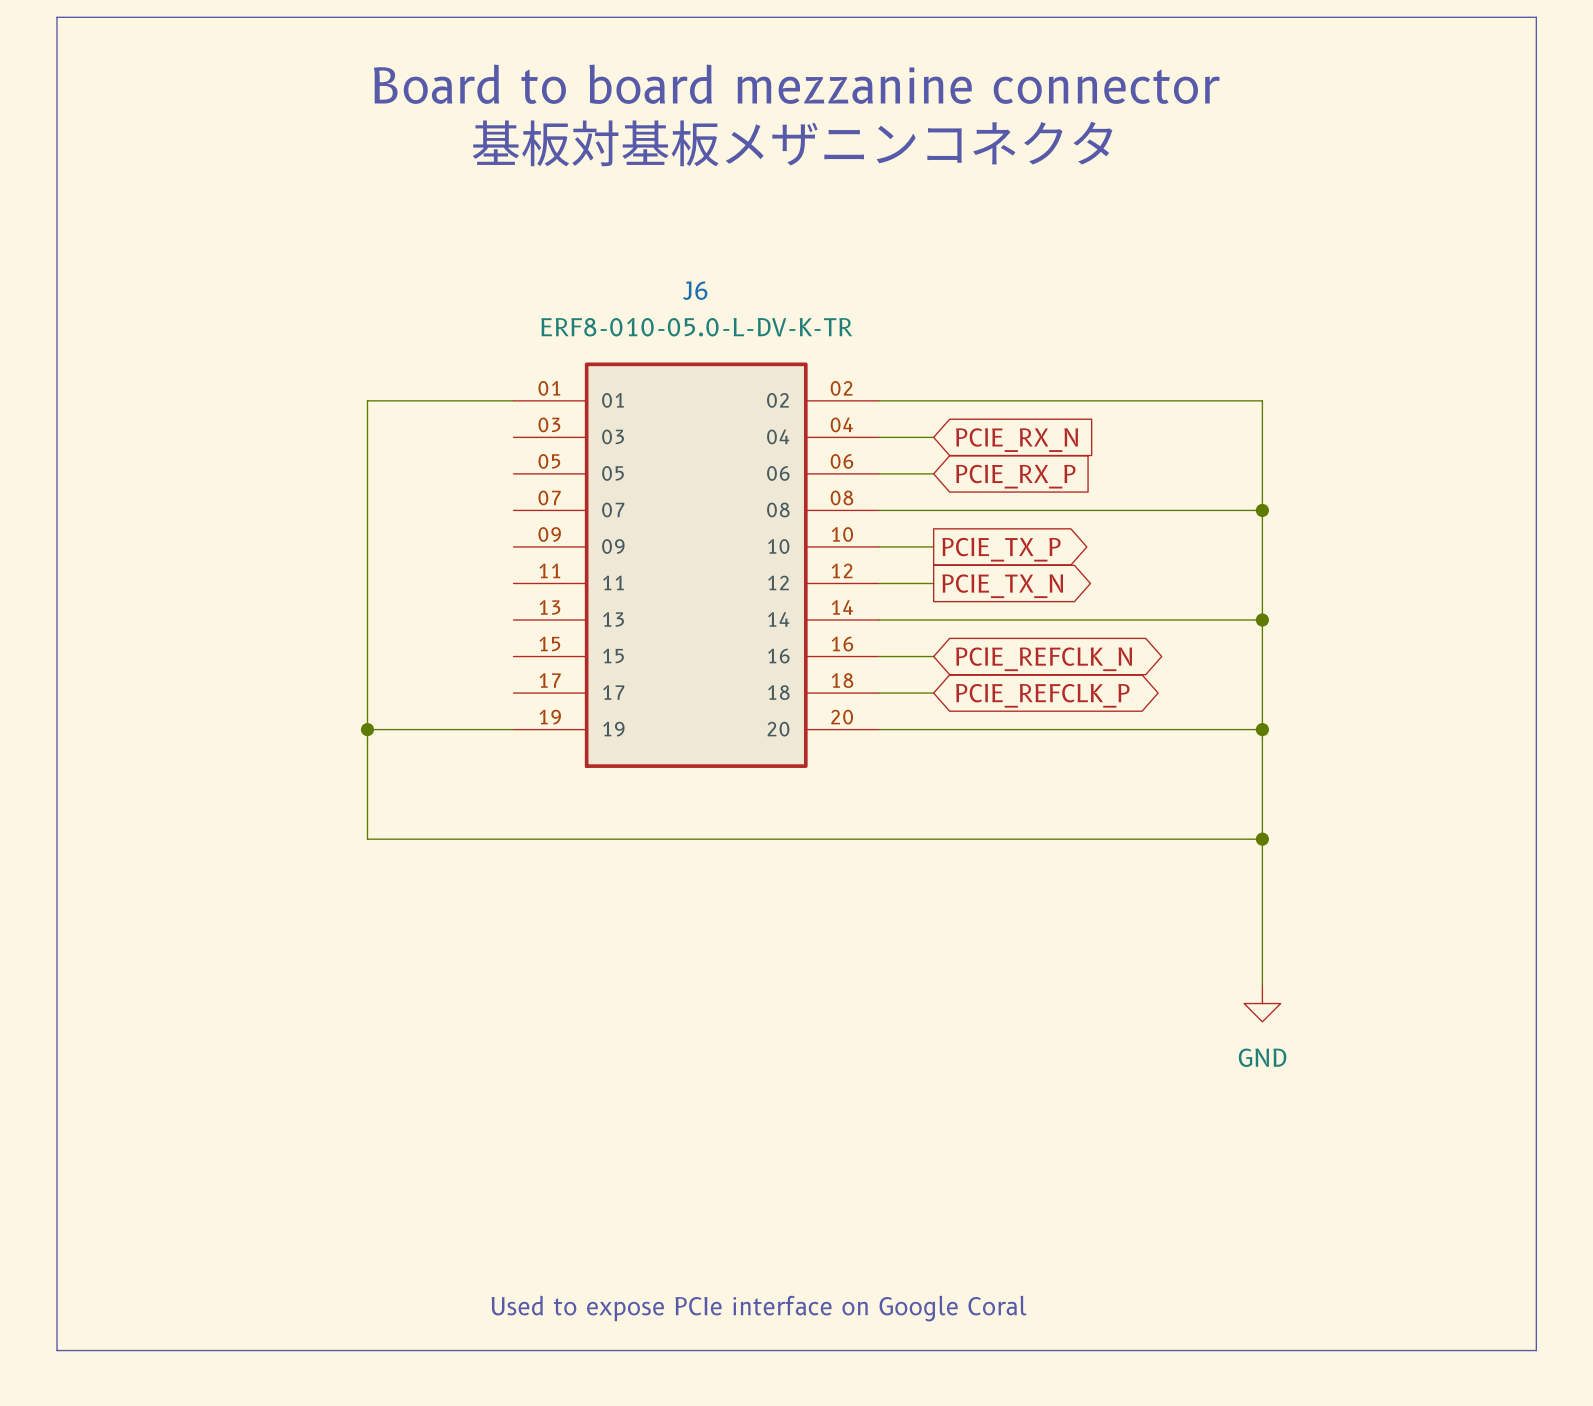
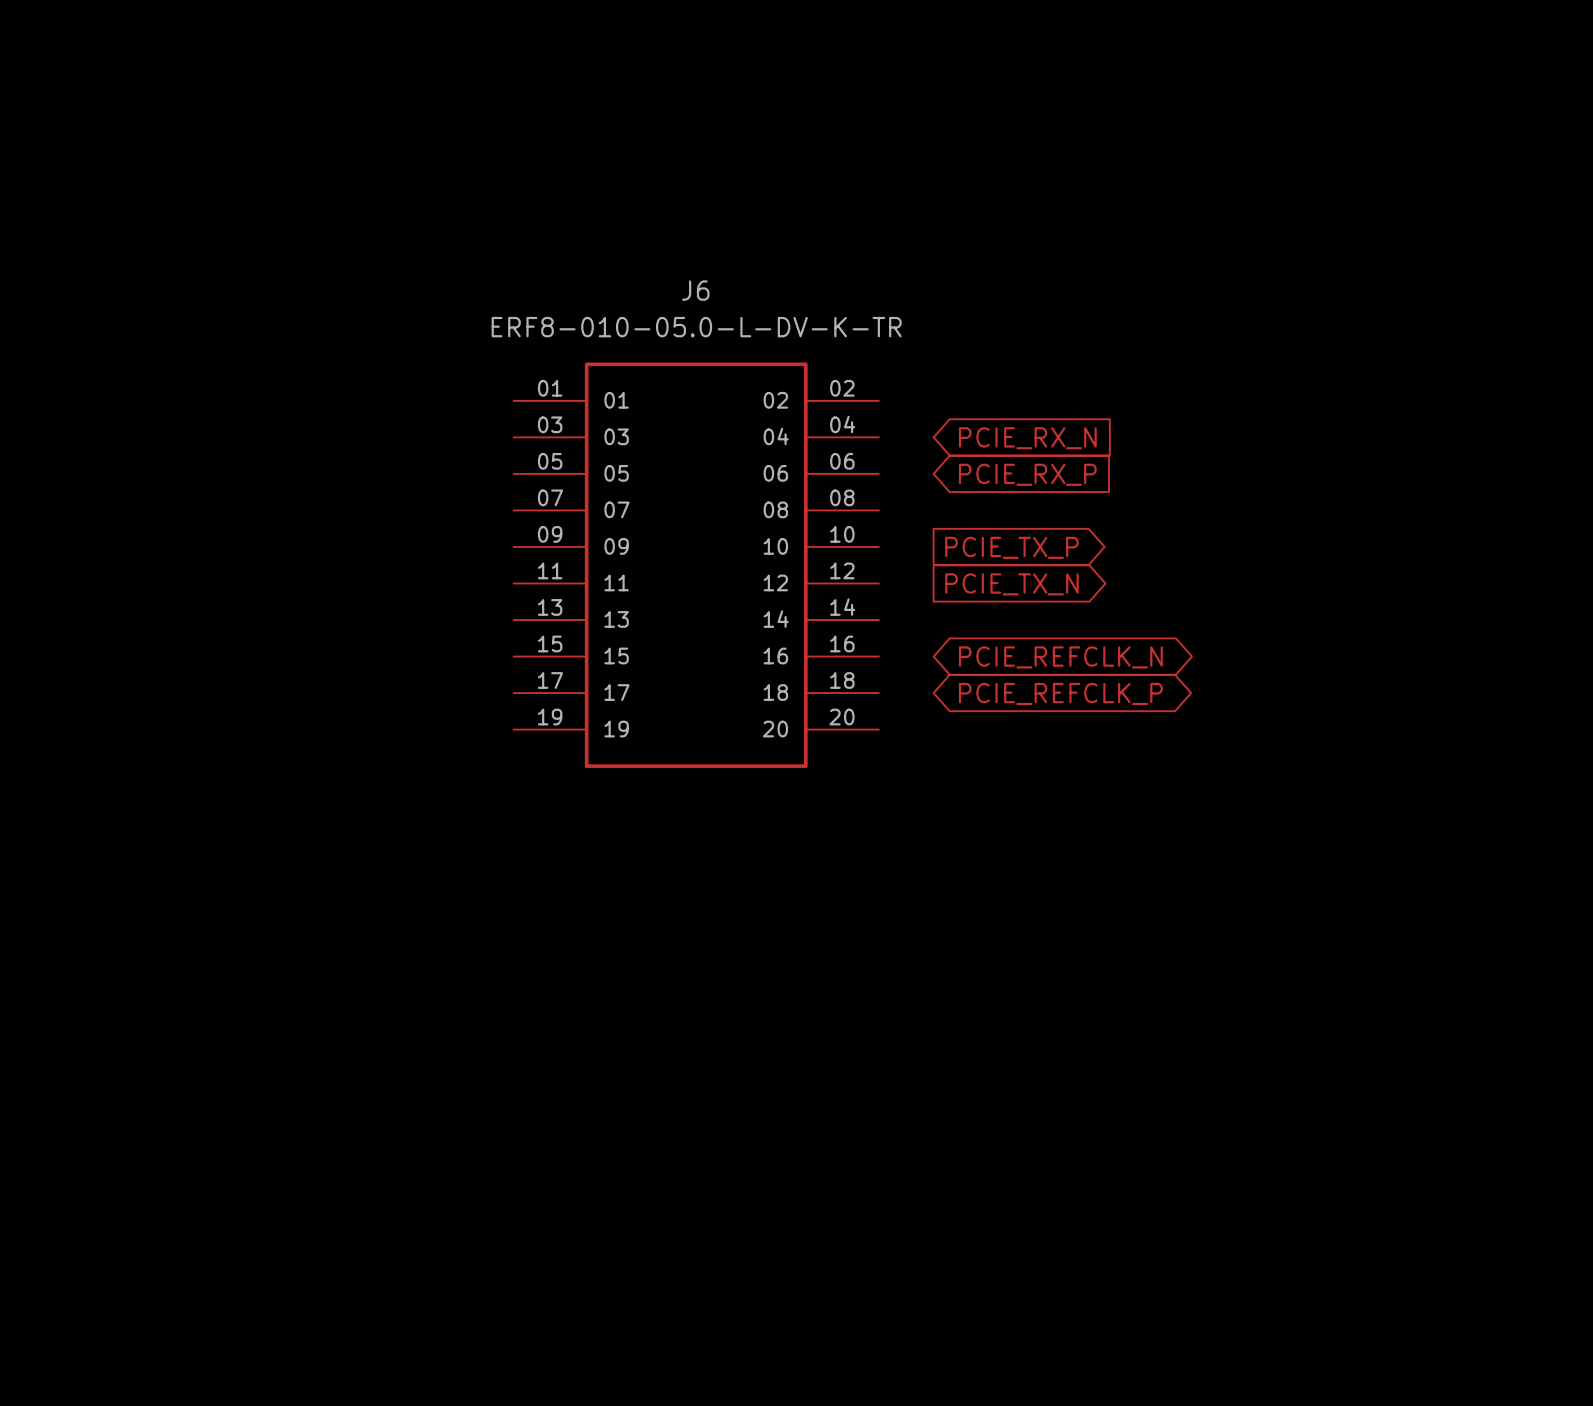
line: (57, 17) (1536, 17) (1536, 1350) (57, 1350) (57, 17) -> none
text: Board to board mezzanine connector (796, 84) -> none
text: 基板対基板メザニンコネクタ (792, 143) -> none
wire: (513, 400) (367, 400) (367, 839) (1262, 839) -> none
wire: (878, 400) (1262, 400) (1262, 985) -> none
wire: (878, 437) (933, 437) -> none
wire: (878, 473) (933, 473) -> none
wire: (878, 510) (1262, 510) -> none
junction: (1262, 510) -> none
wire: (878, 546) (933, 546) -> none
wire: (878, 583) (933, 583) -> none
wire: (878, 620) (1262, 620) -> none
junction: (1262, 620) -> none
wire: (878, 656) (933, 656) -> none
wire: (878, 693) (933, 693) -> none
wire: (367, 729) (513, 729) -> none
junction: (367, 729) -> none
wire: (878, 729) (1262, 729) -> none
junction: (1262, 729) -> none
junction: (1262, 839) -> none
power symbol: GND (1262, 1003) -> none
text: Used to expose PCIe interface on Google Coral (759, 1308) -> none

